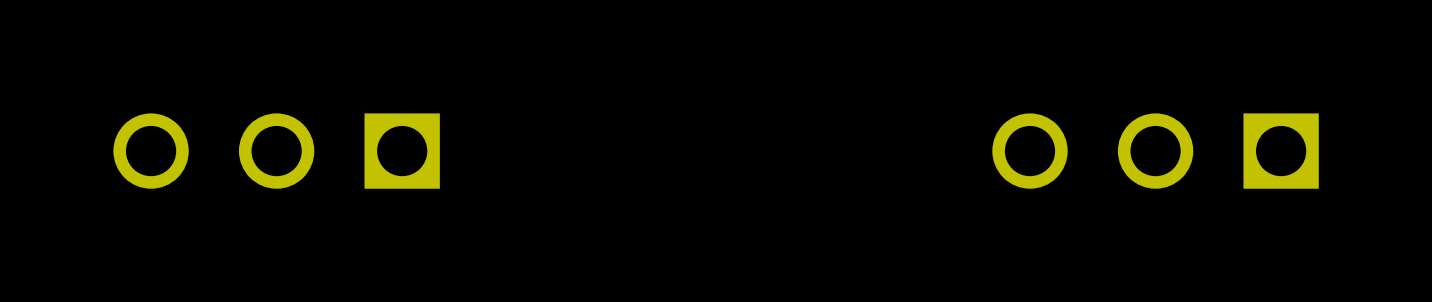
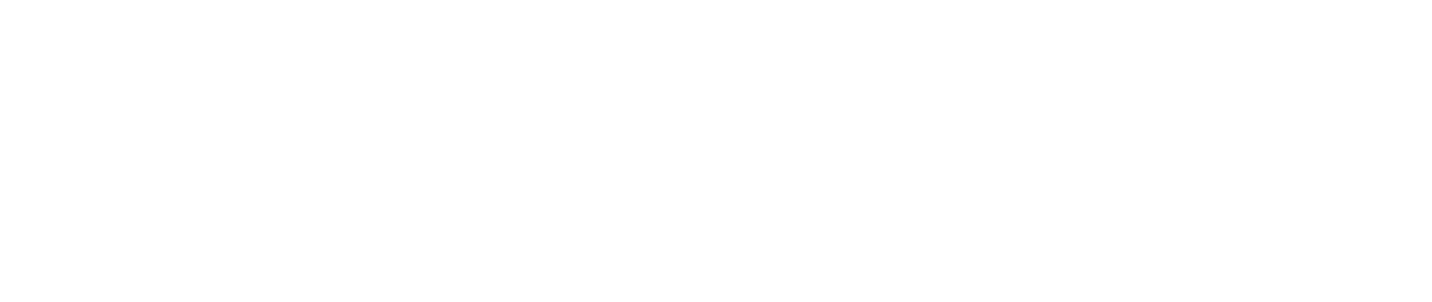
part: (276, 151) -> none
part: (1155, 151) -> none

